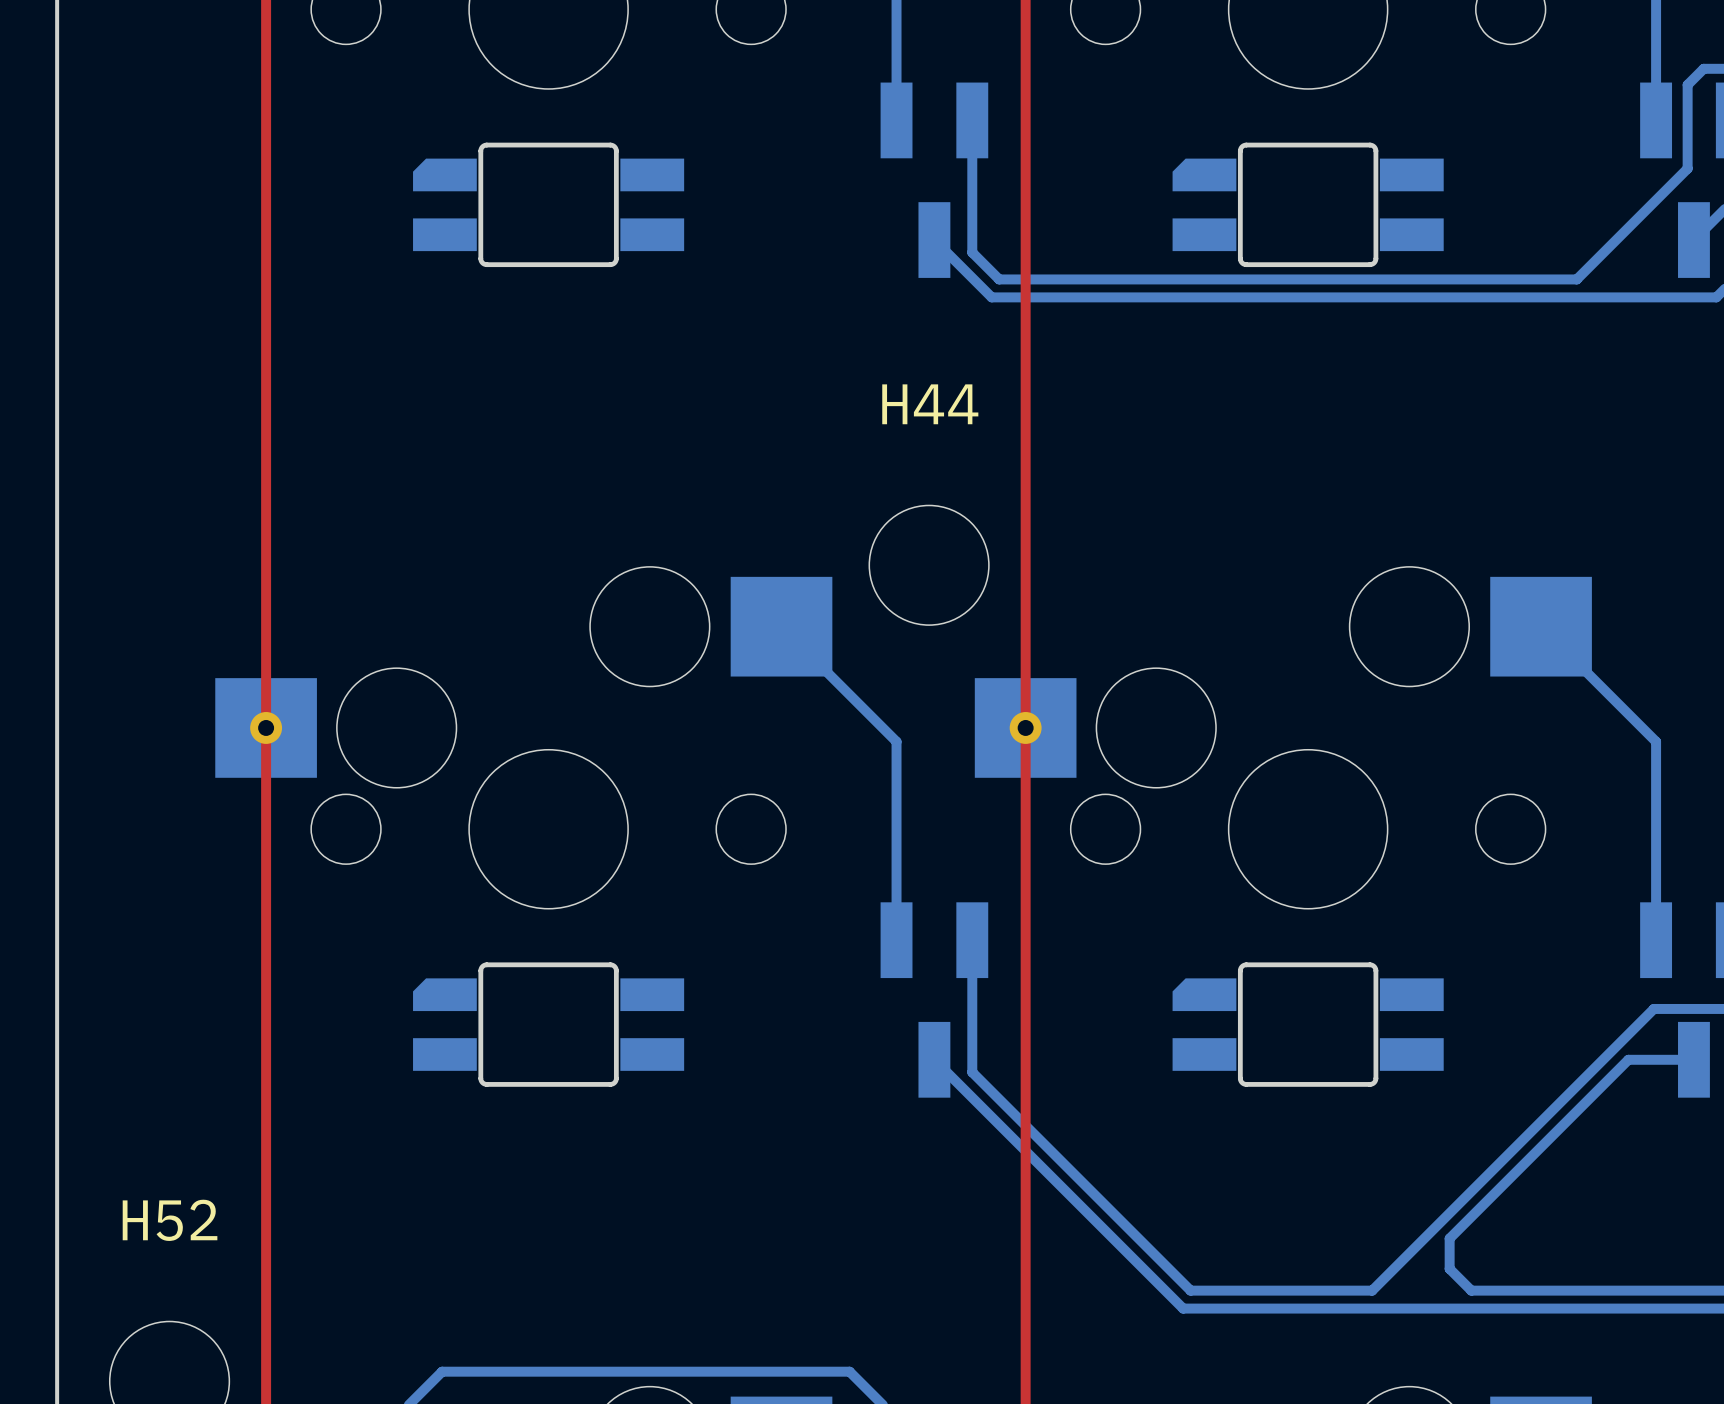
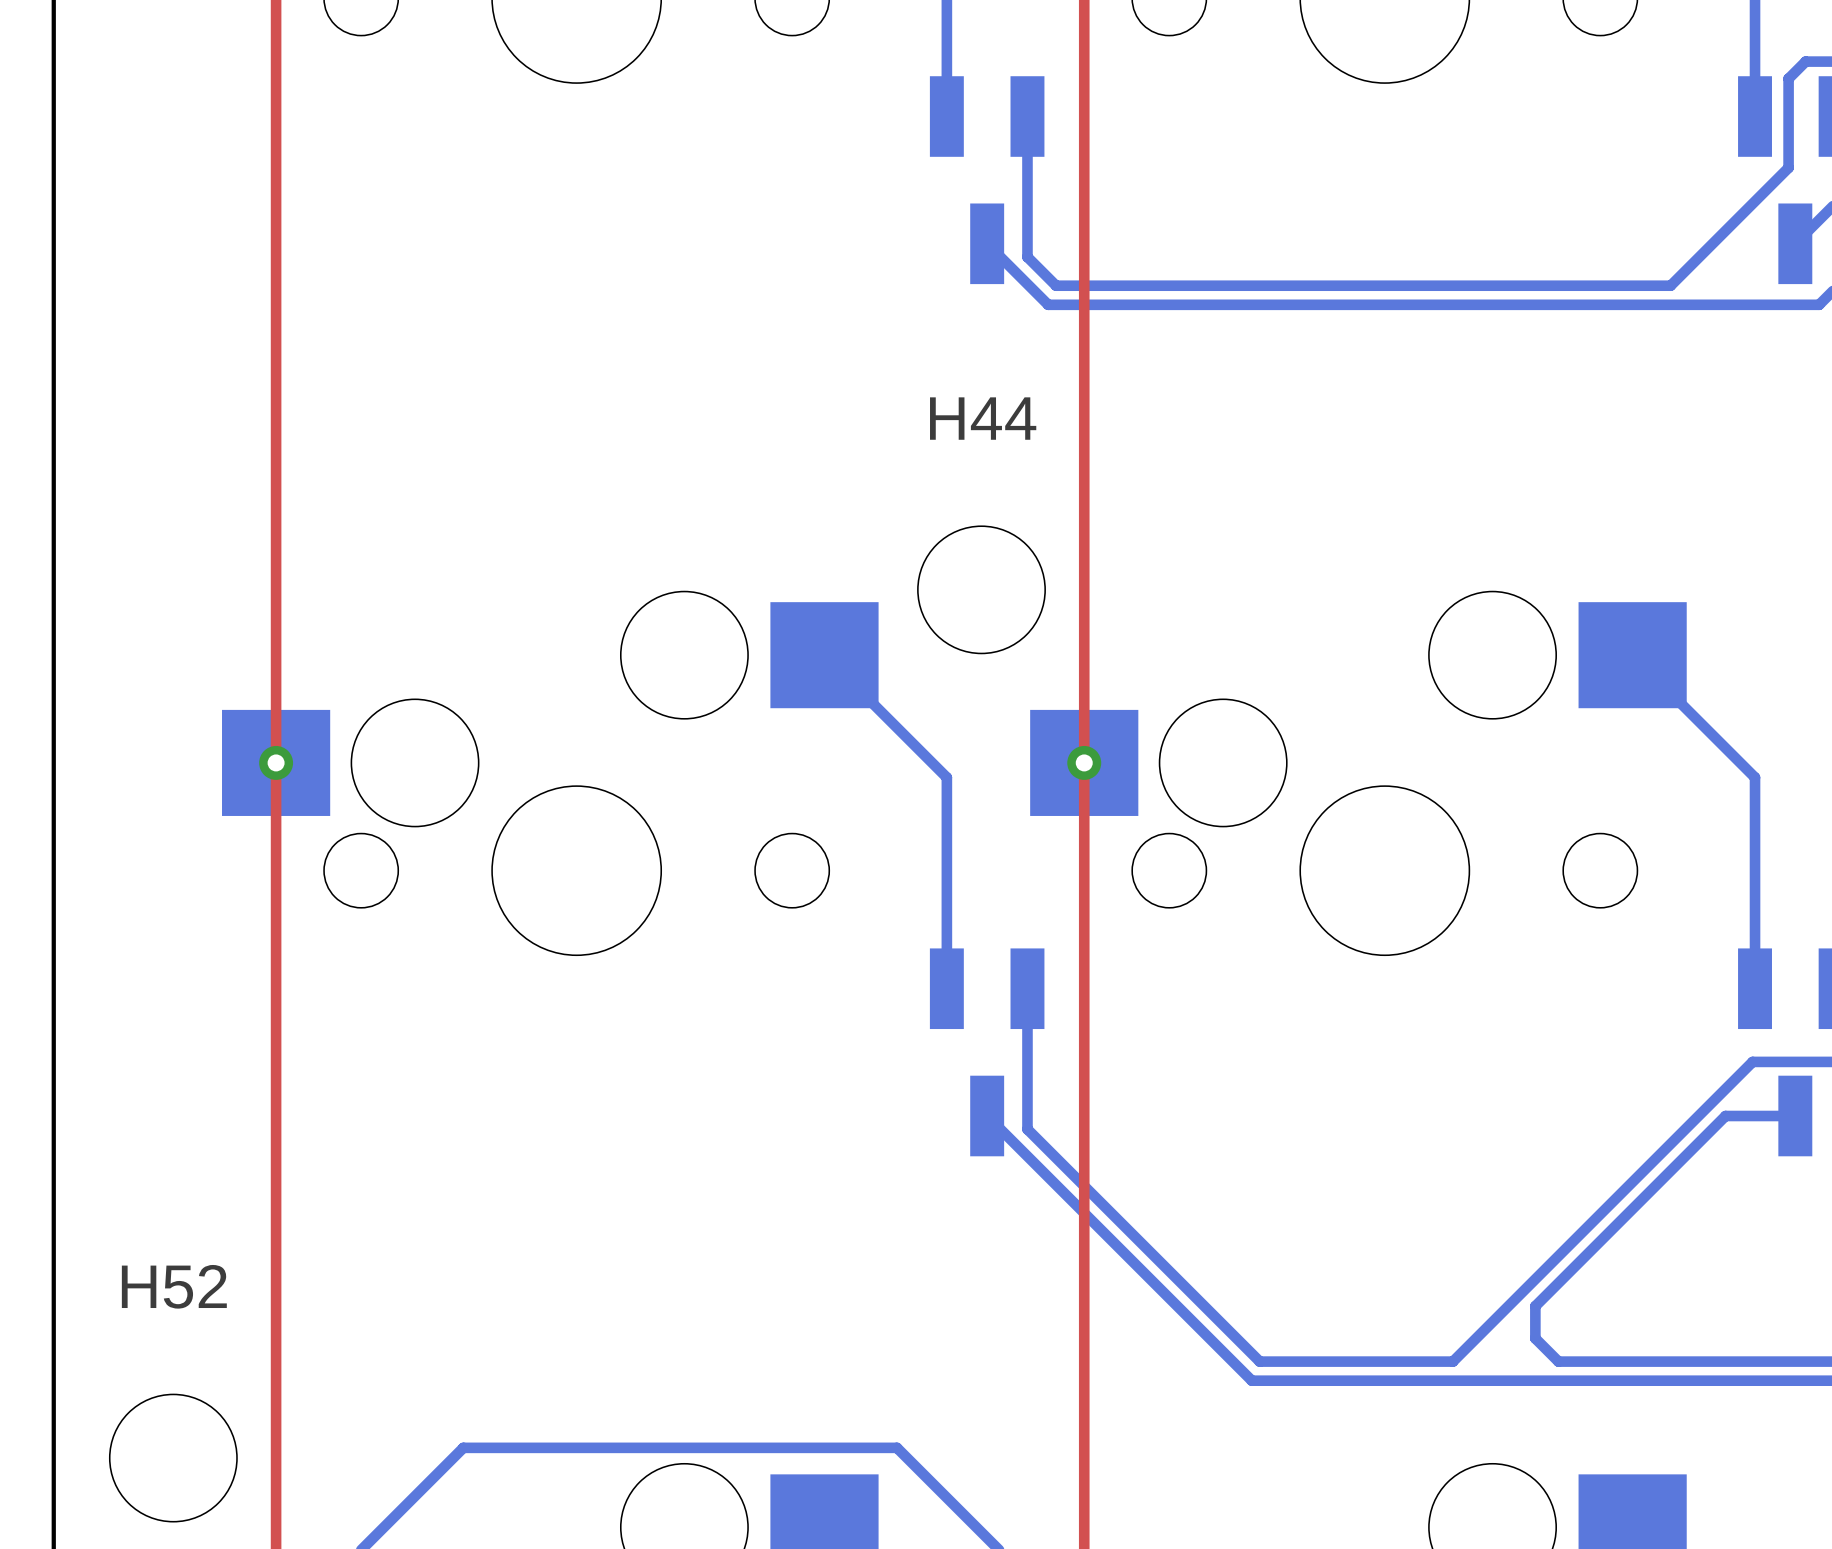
part: (548, 204) -> none
part: (1308, 204) -> none
part: (548, 1024) -> none
part: (1308, 1024) -> none

